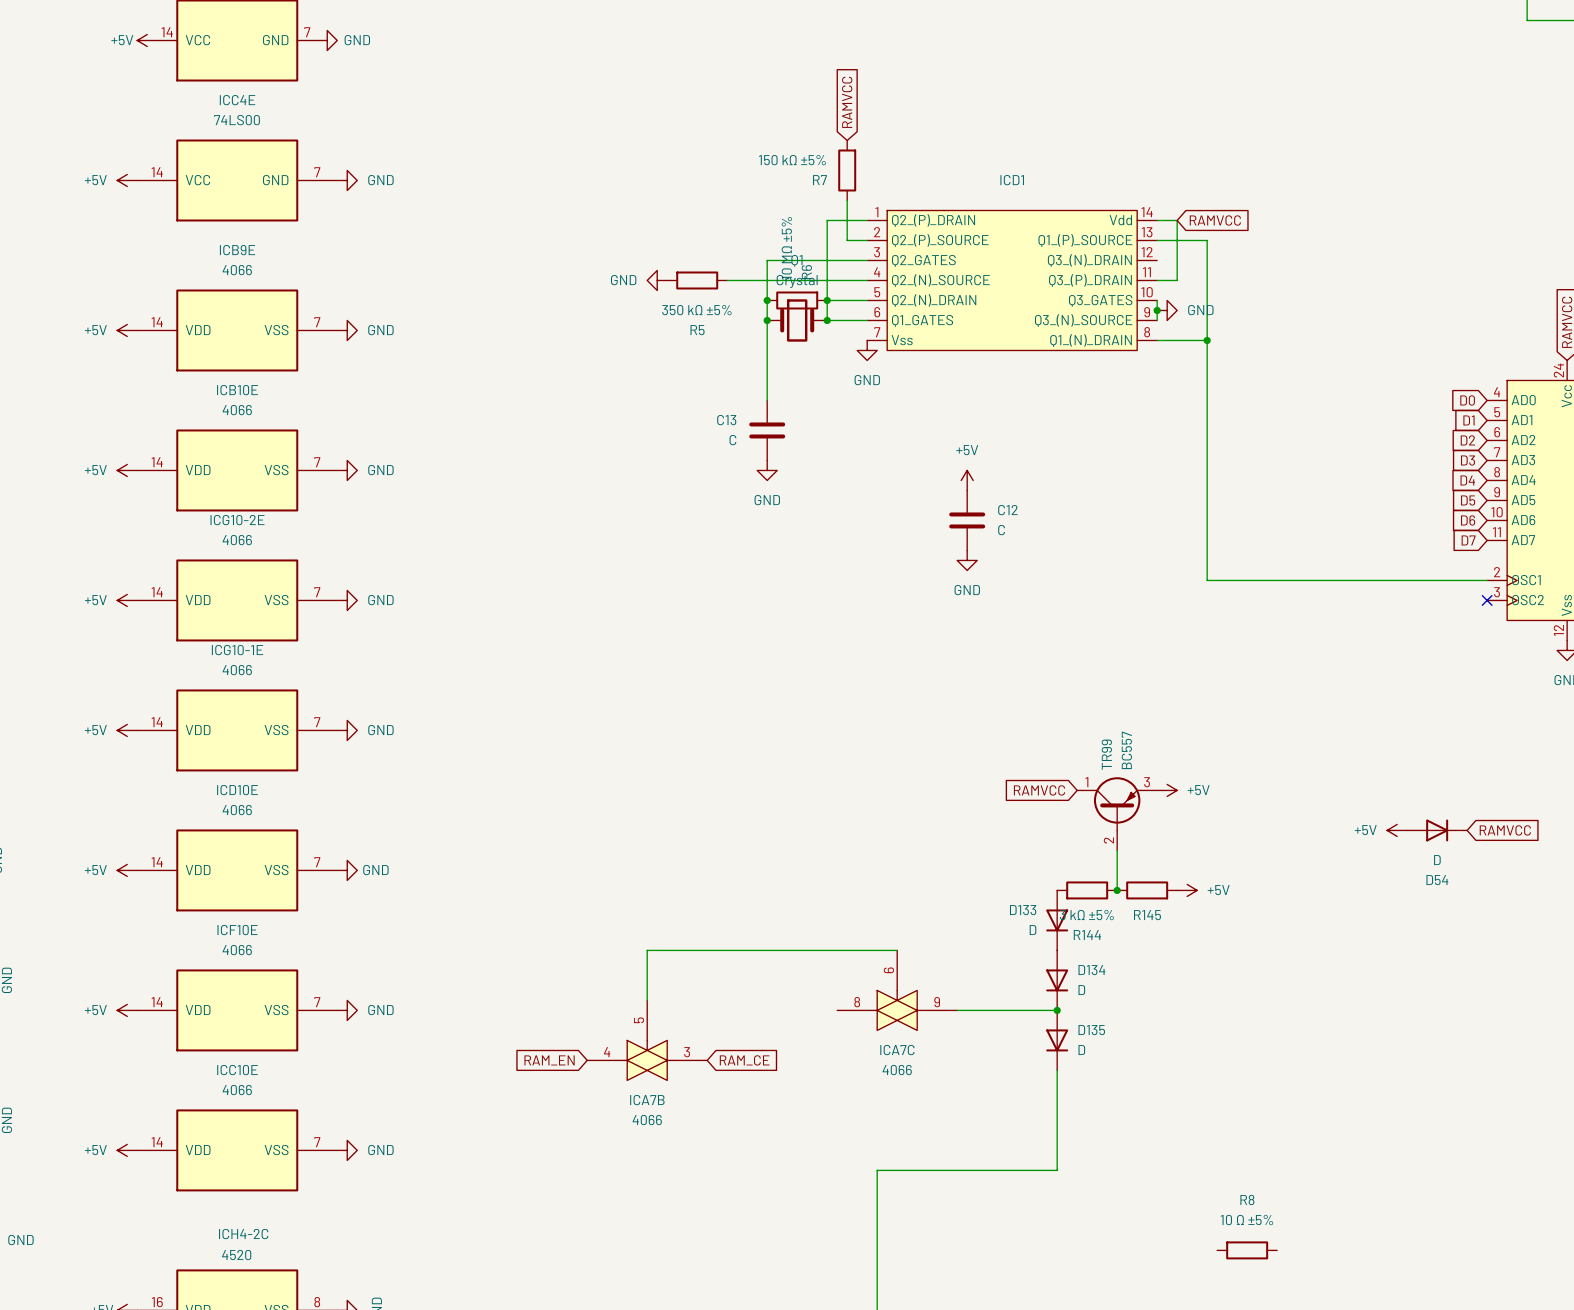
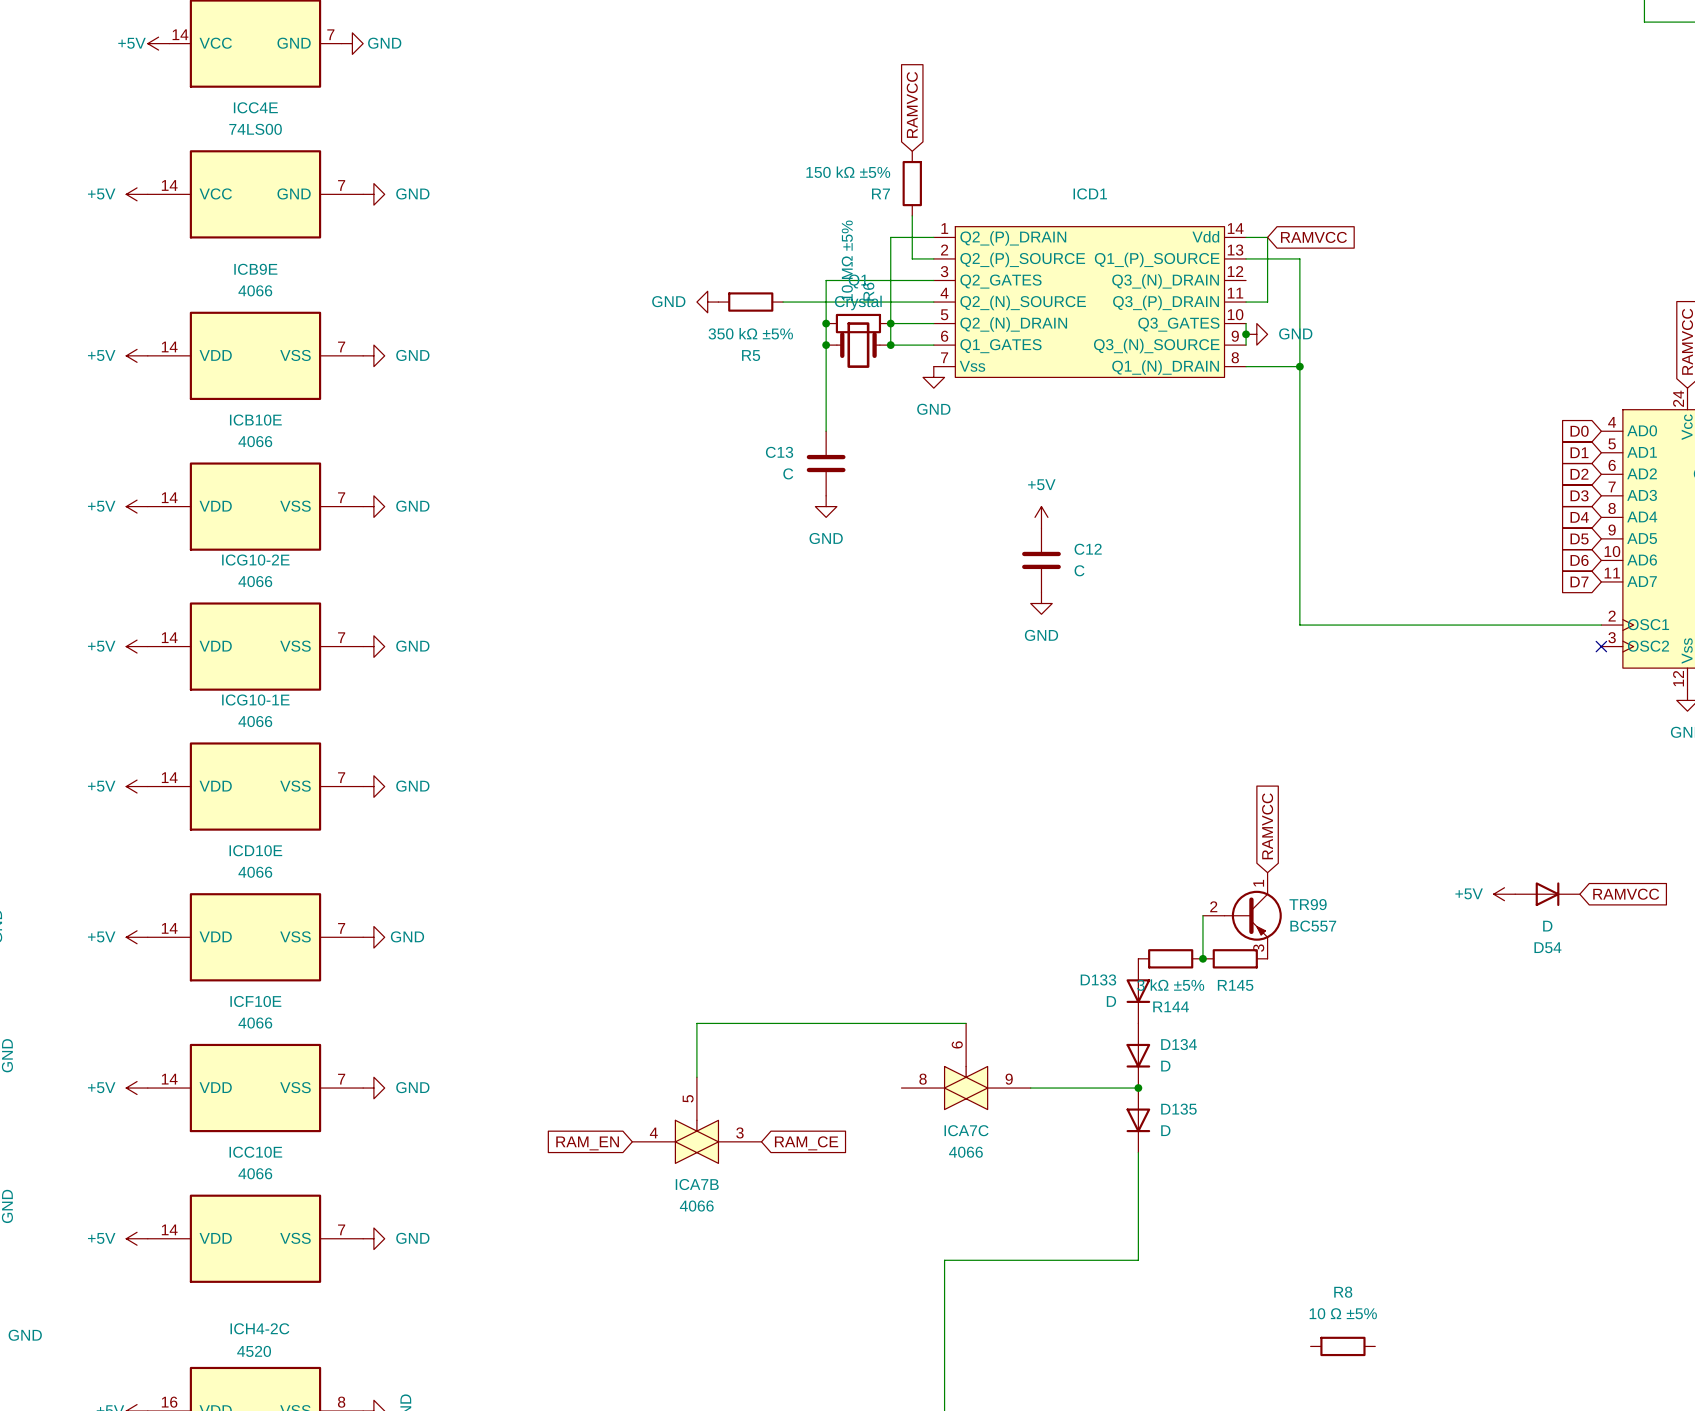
global label rotation: 0° (1039, 790) -> 90° clockwise (1267, 826)
global label position: RAMVCC (1039, 790) -> RAMVCC (1267, 826)
power symbol: +5V (1167, 790) -> none
TR99 rotation: 0° (1117, 803) -> 90° clockwise (1253, 915)
TR99 position: (1117, 813) -> (1242, 915)
power symbol: +5V (1187, 890) -> none

